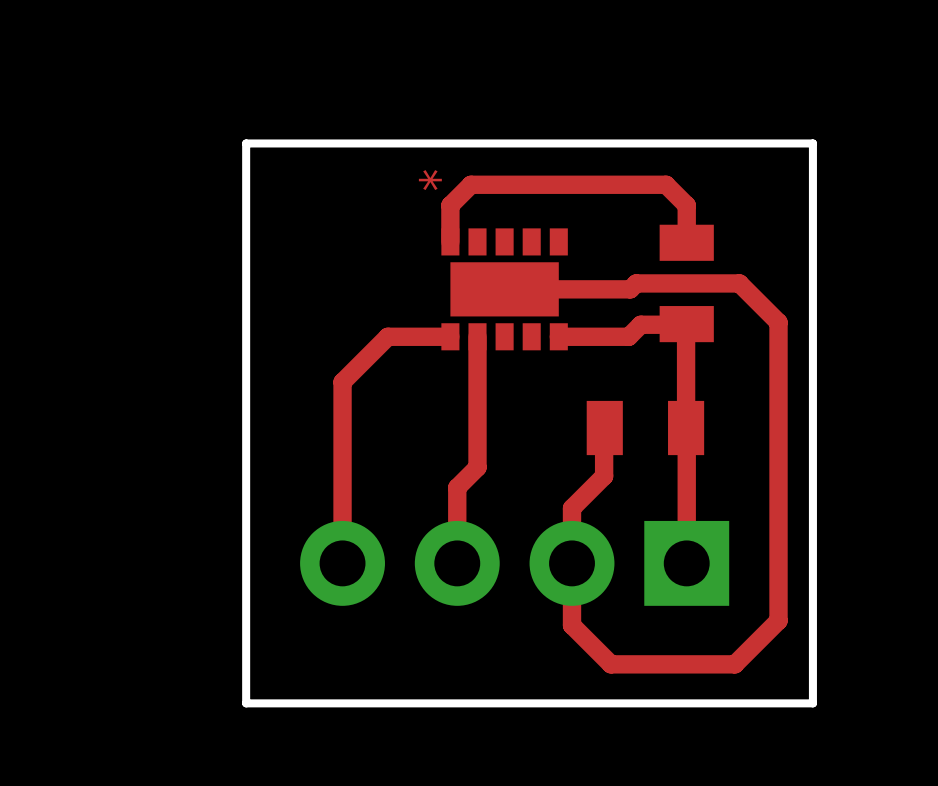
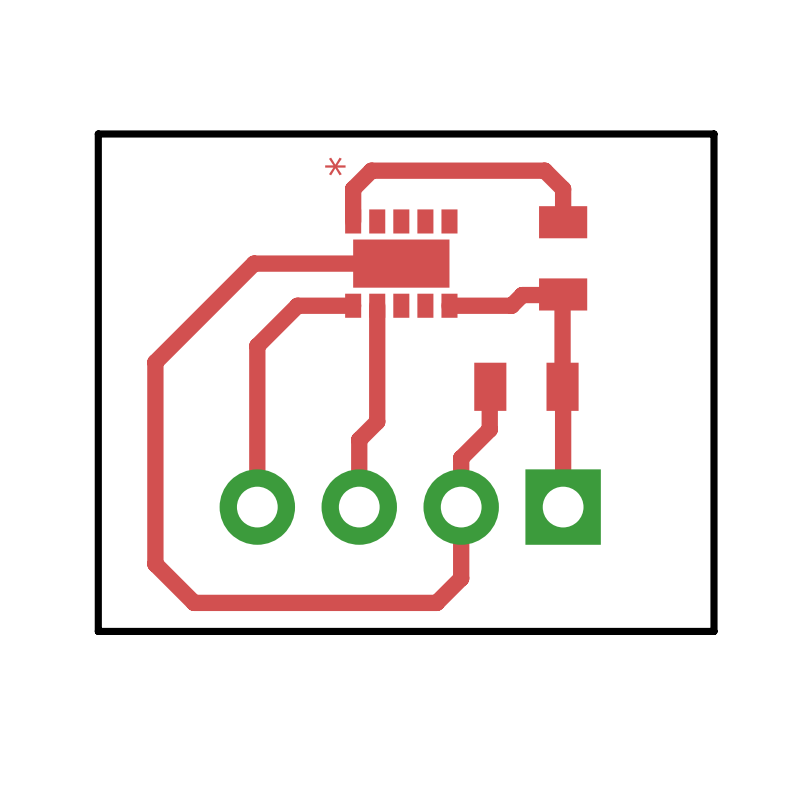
board edge: (246, 143) (246, 703) -> (171, 133) (98, 133) (98, 631) (171, 631)
board edge: (812, 143) (812, 703) -> (675, 133) (713, 133) (713, 631) (675, 631)
top track: (504, 289) (630, 289) (636, 283) (739, 283) (778, 322) (778, 620) (734, 664) (611, 664) (572, 625) -> (401, 263) (254, 263) (155, 362) (155, 564) (194, 602) (436, 602) (461, 578) (461, 562)

